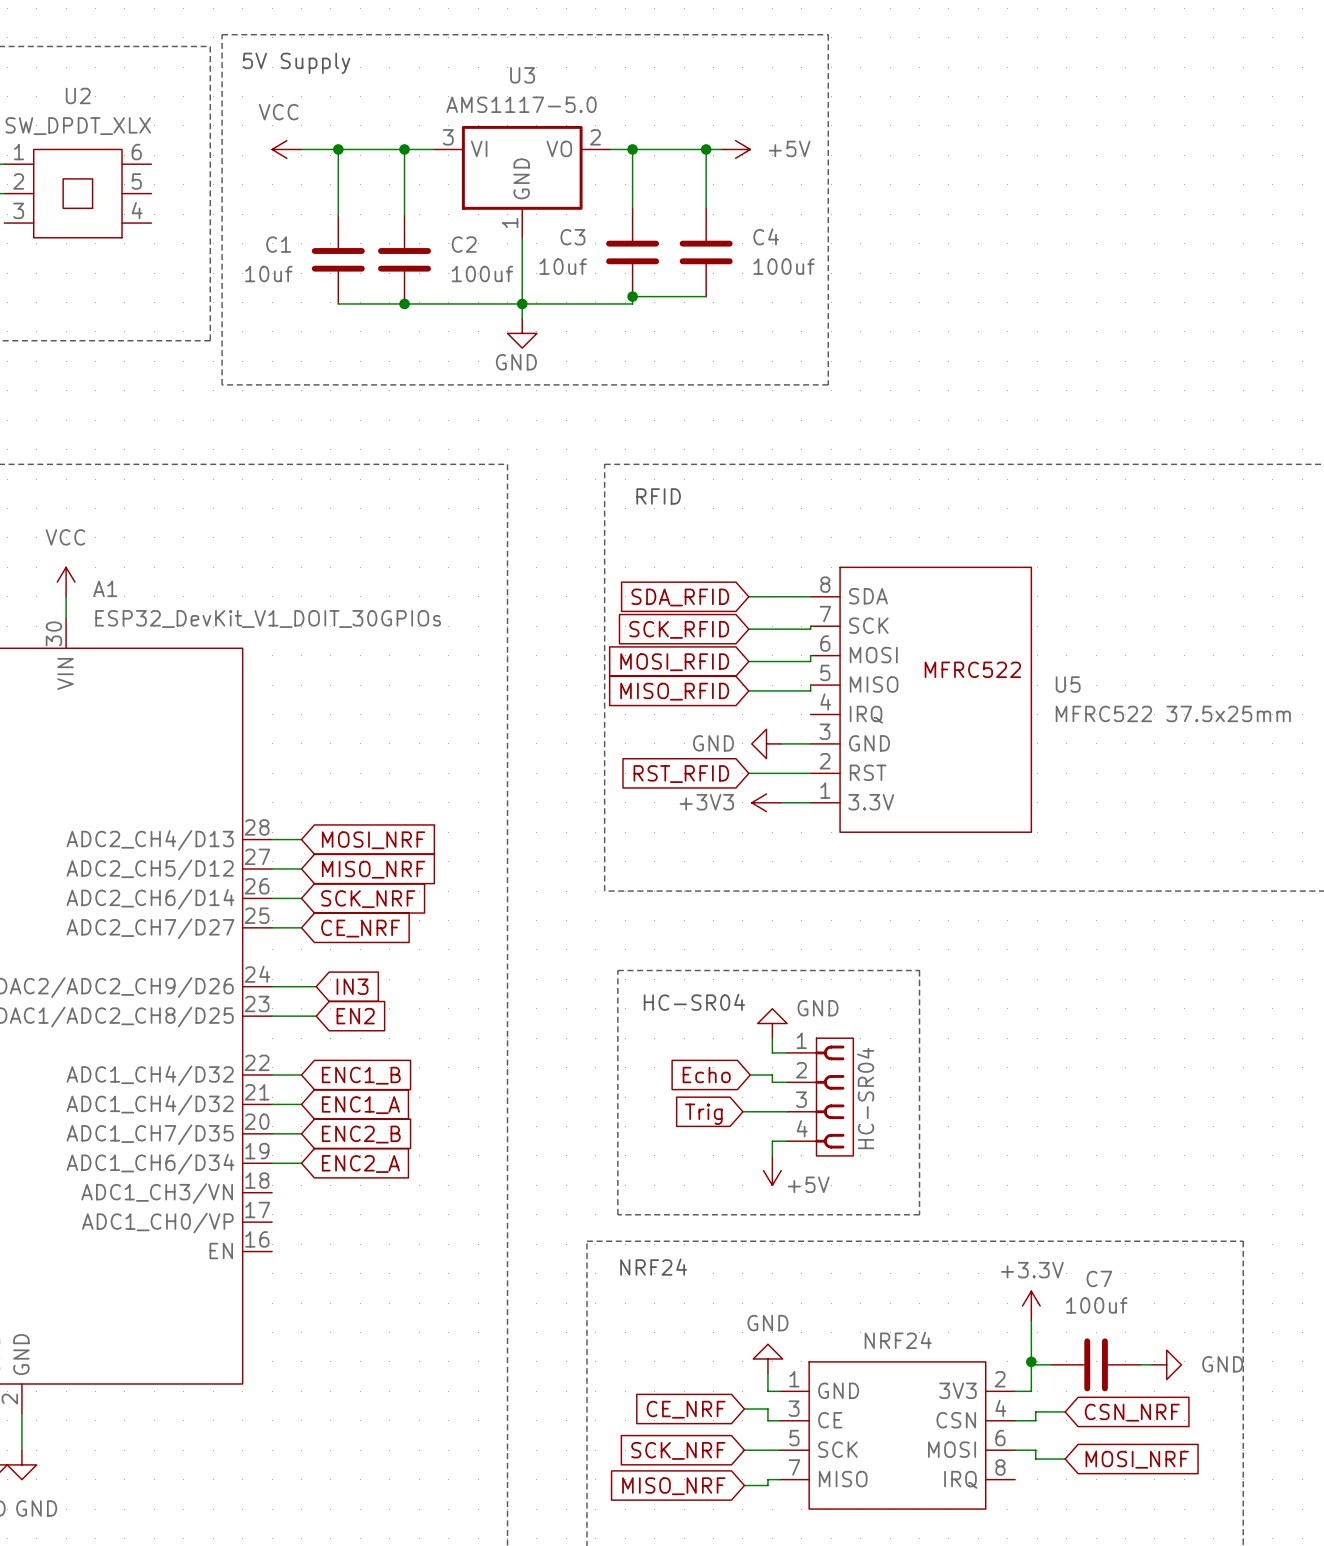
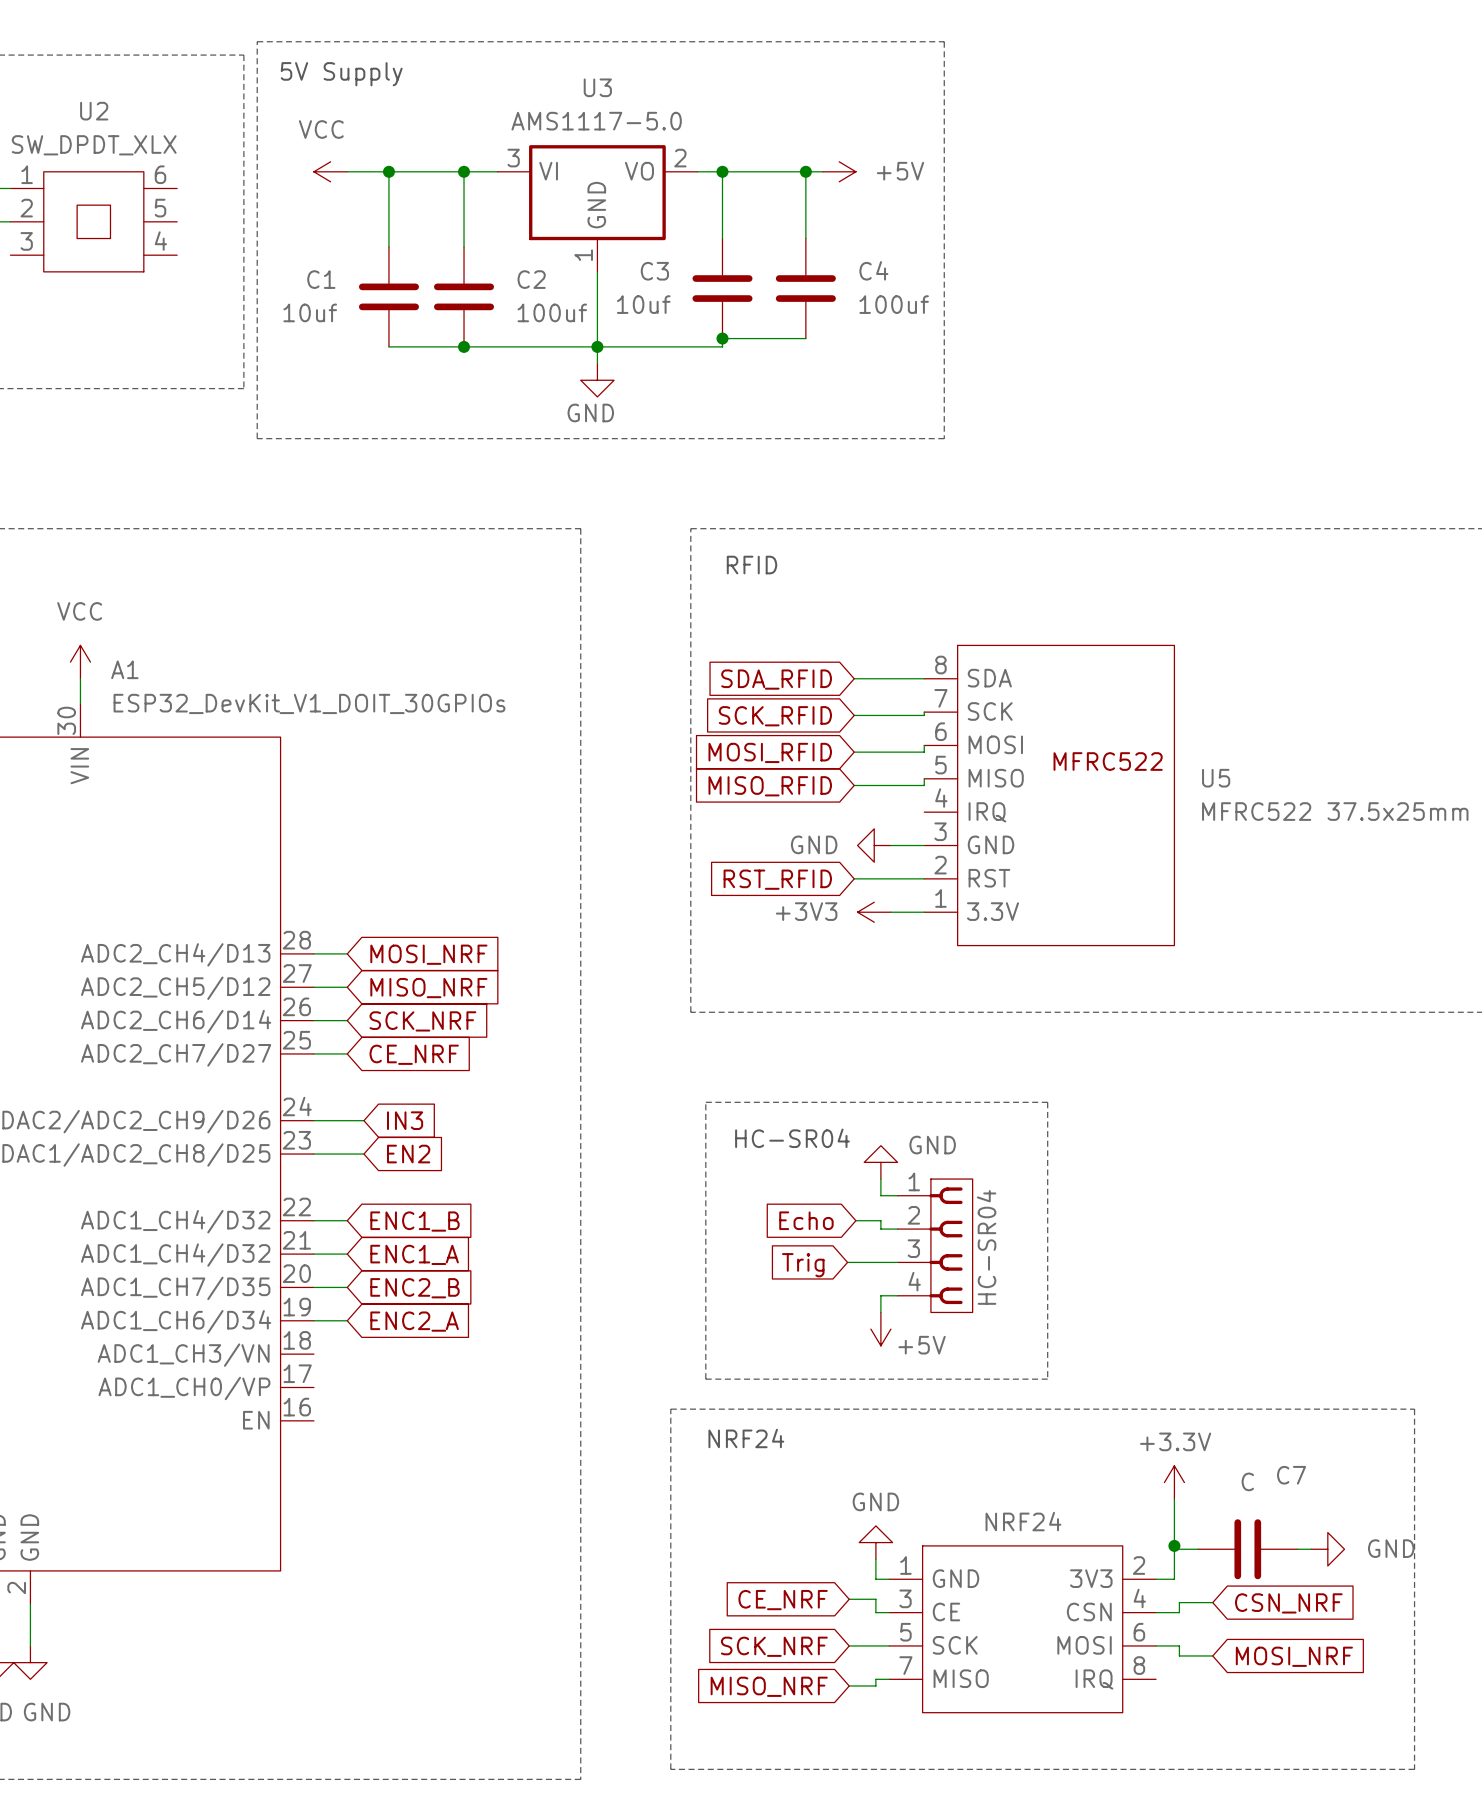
C7 name position: C7 (1099, 1278) -> C7 (1291, 1475)
C7 value: 100uf (1096, 1305) -> C (1247, 1481)

